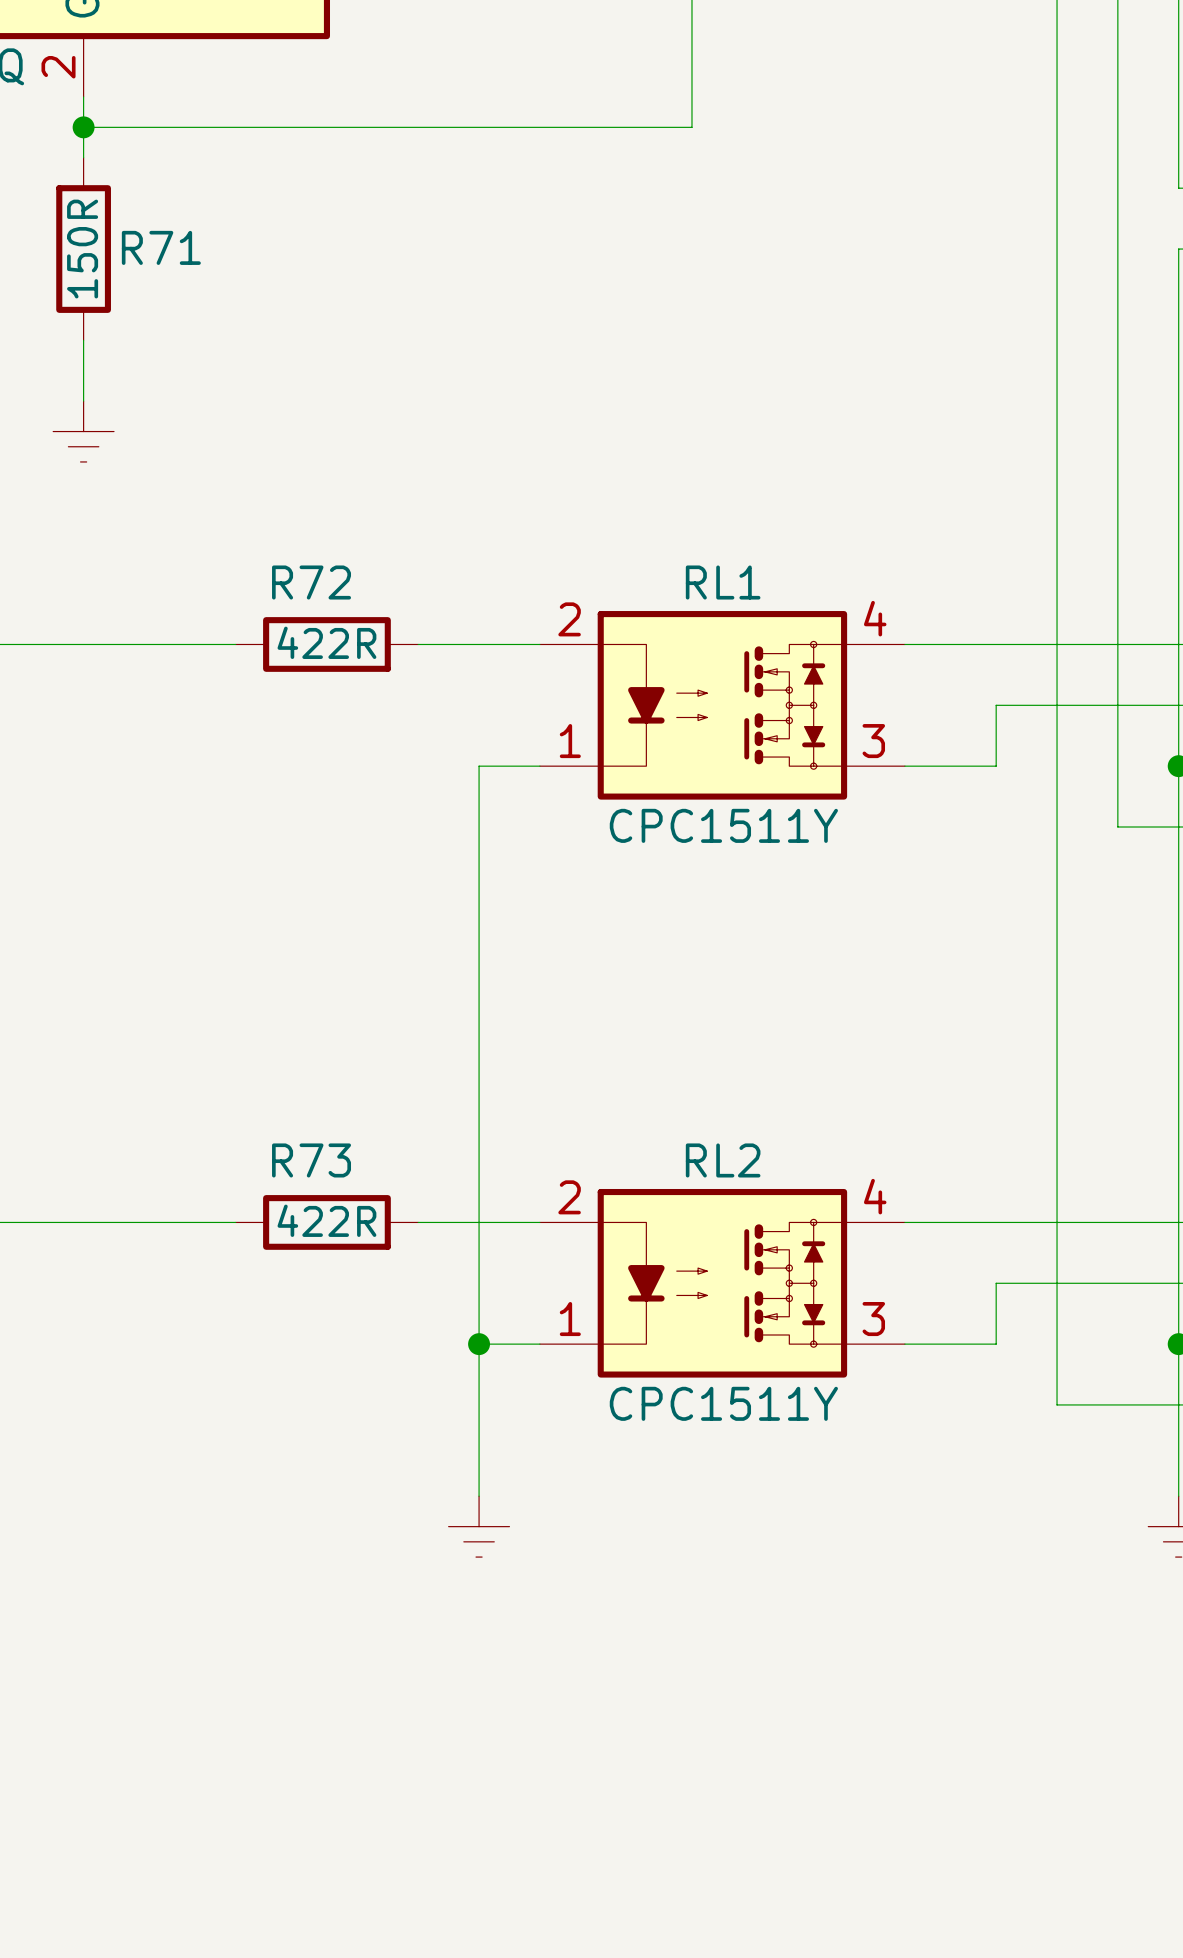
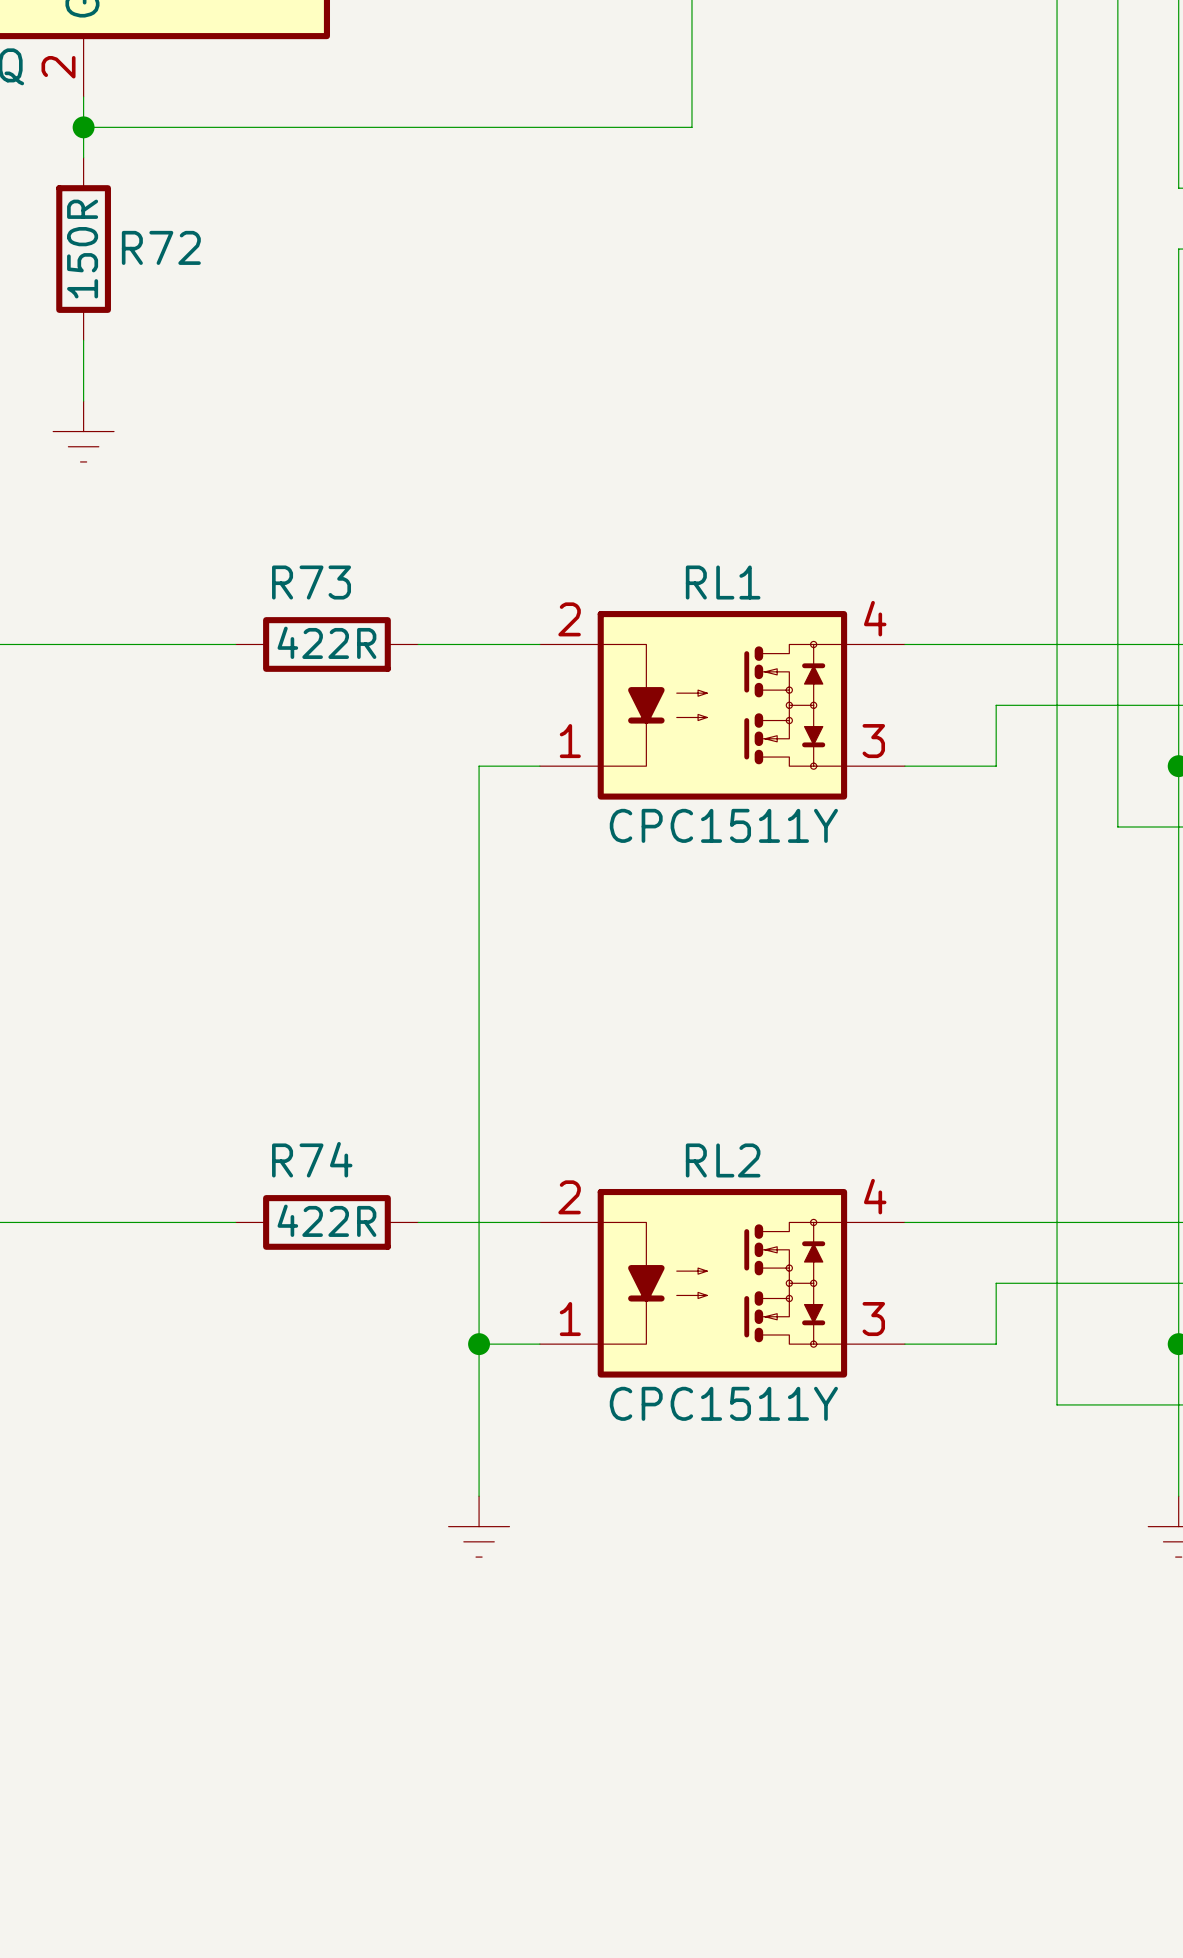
R71 name: R71 (161, 247) -> R72 (161, 247)
R72 name: R72 (311, 582) -> R73 (311, 582)
R73 name: R73 (311, 1160) -> R74 (312, 1159)

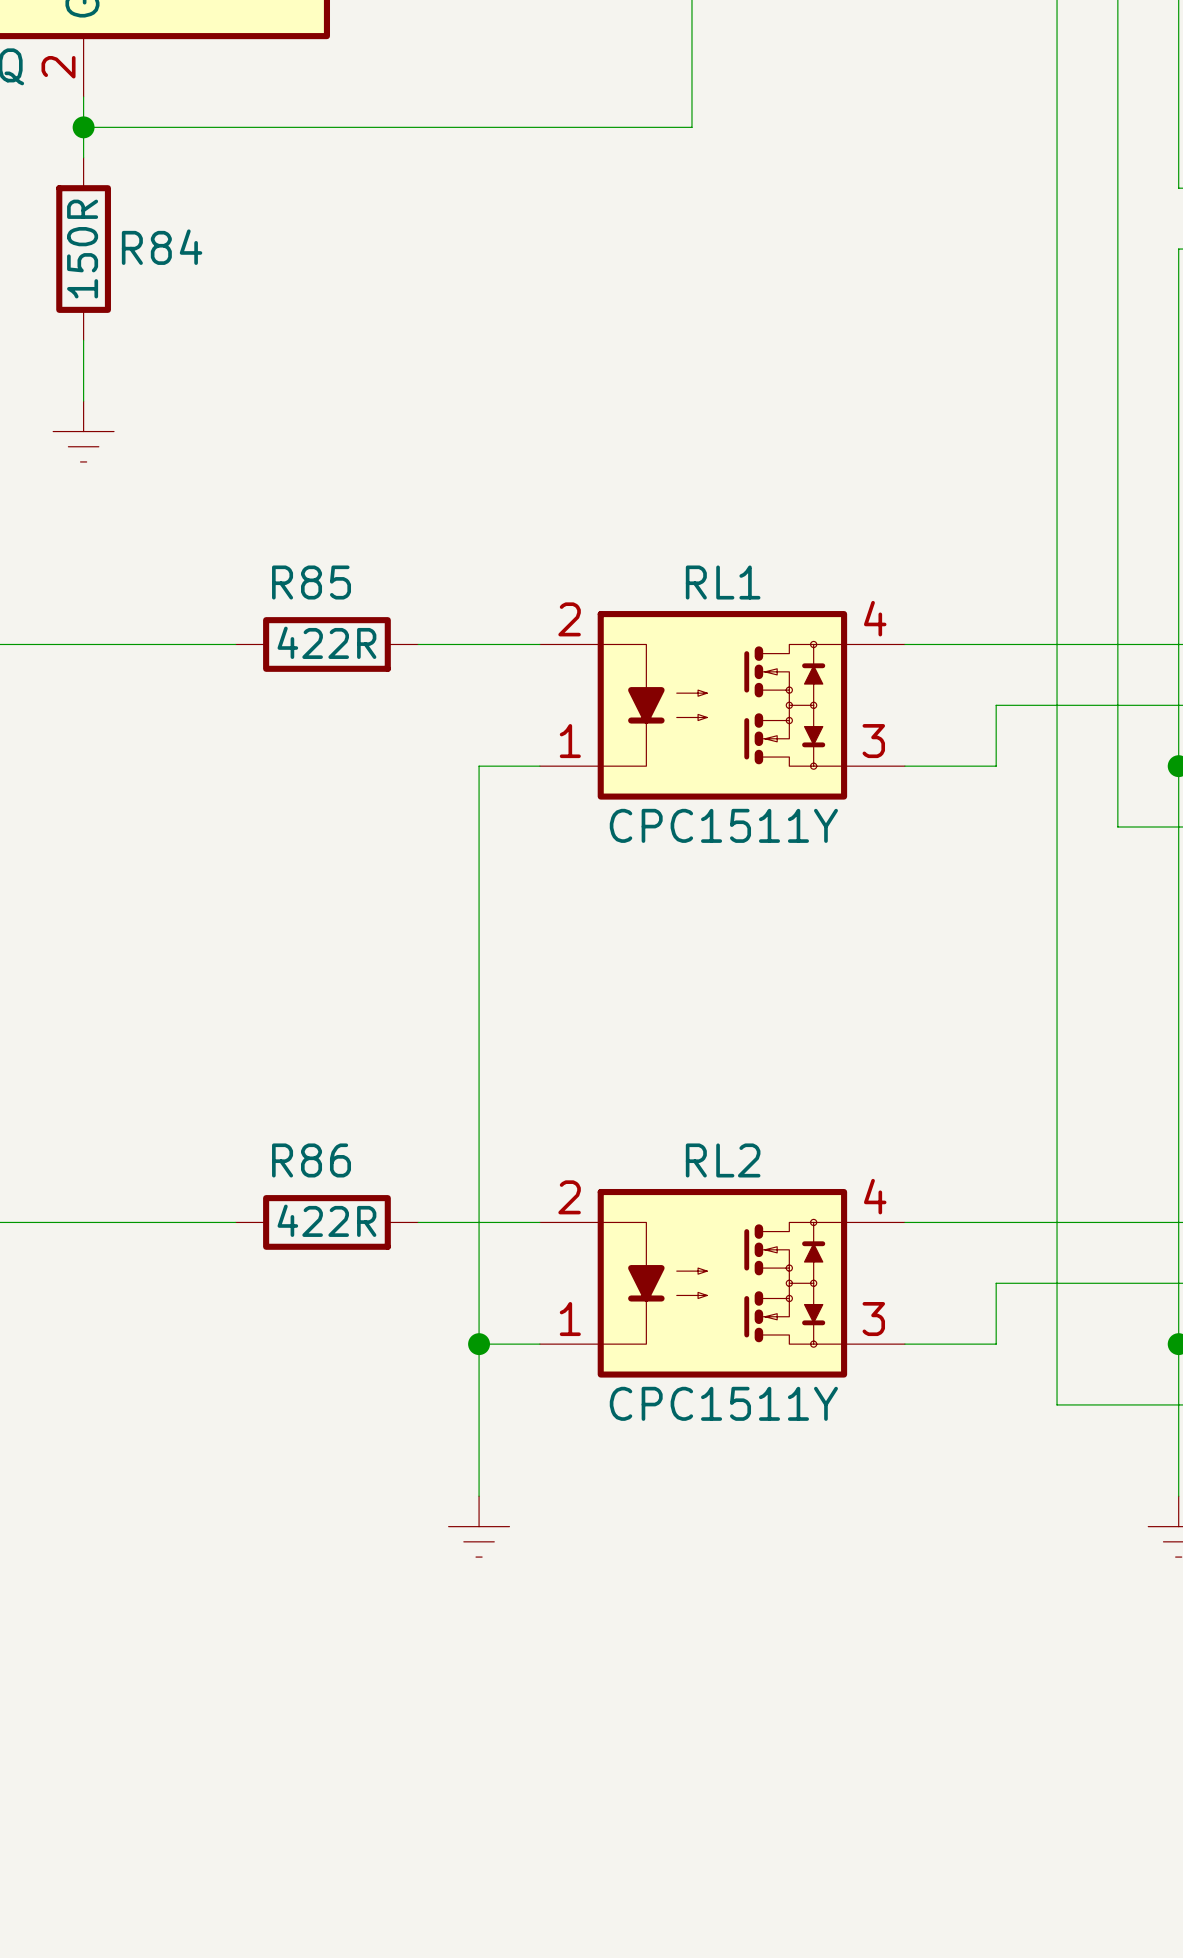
R72 name: R72 (161, 247) -> R84 (162, 247)
R73 name: R73 (311, 582) -> R85 (311, 582)
R74 name: R74 (312, 1159) -> R86 (311, 1160)

